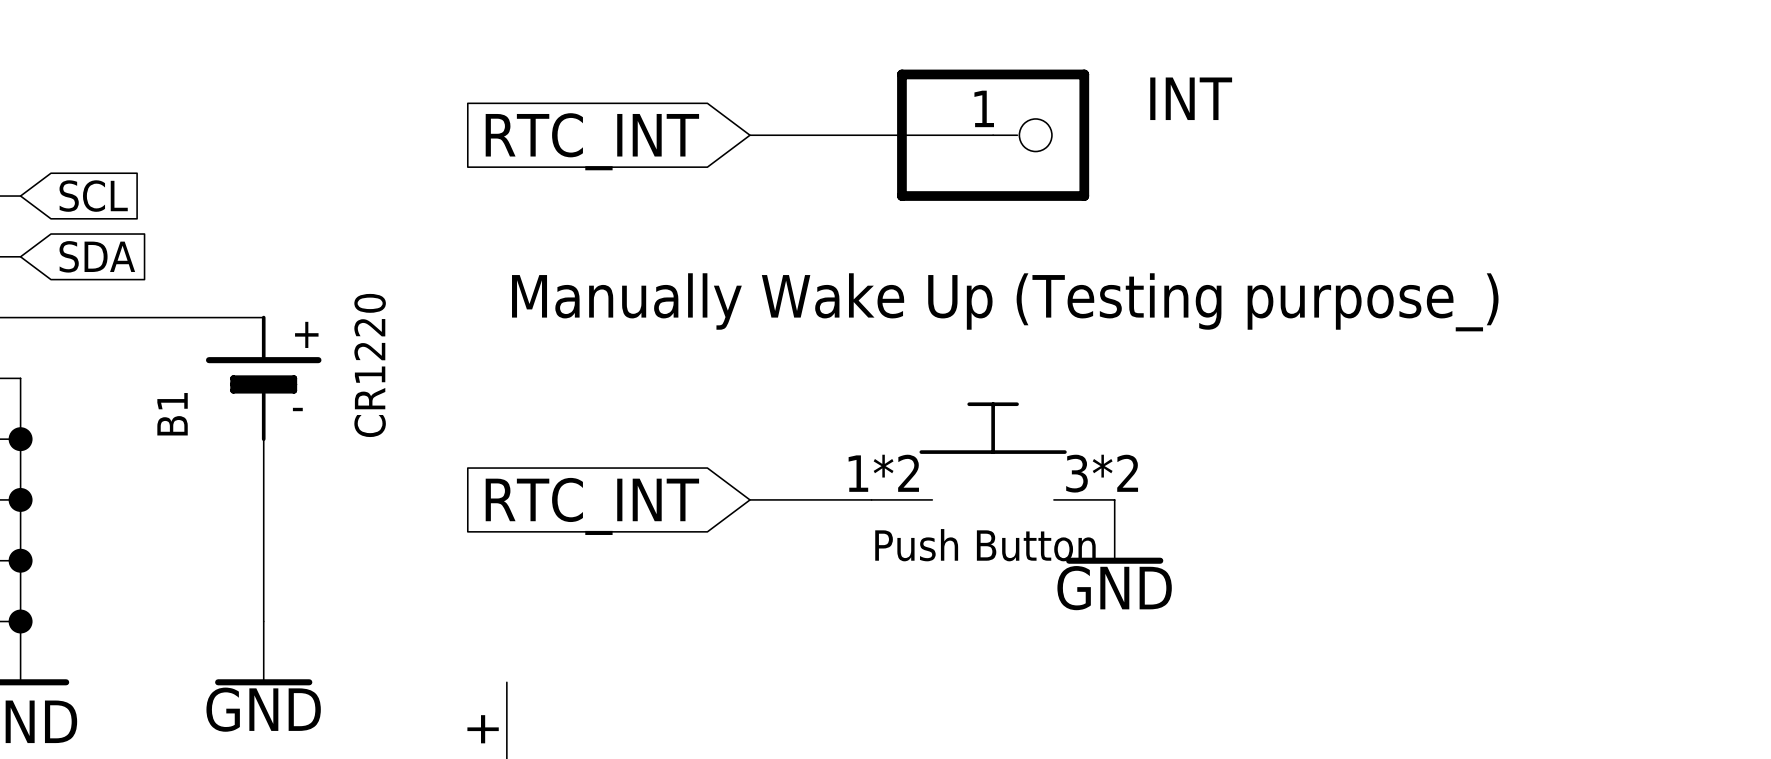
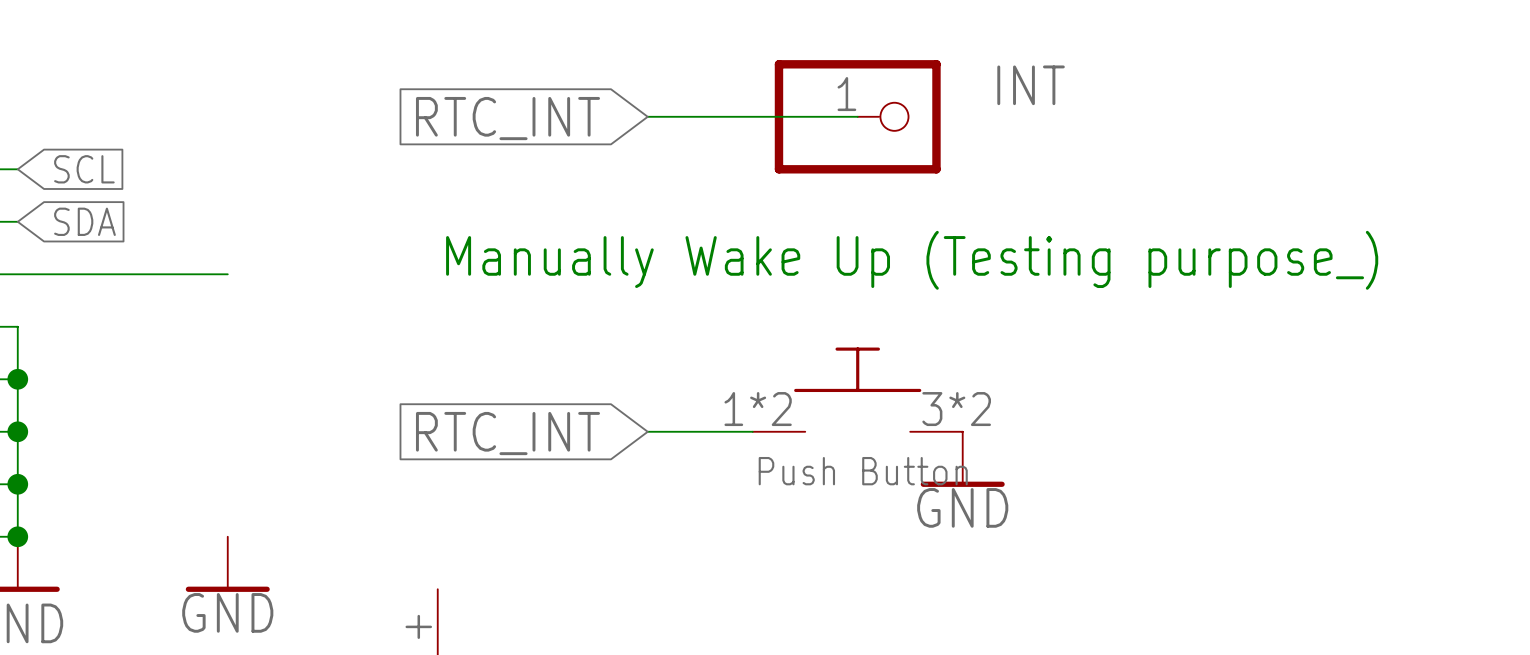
B1: CR1220 (263, 378) -> none
wire: (263, 439) (263, 621) -> none

